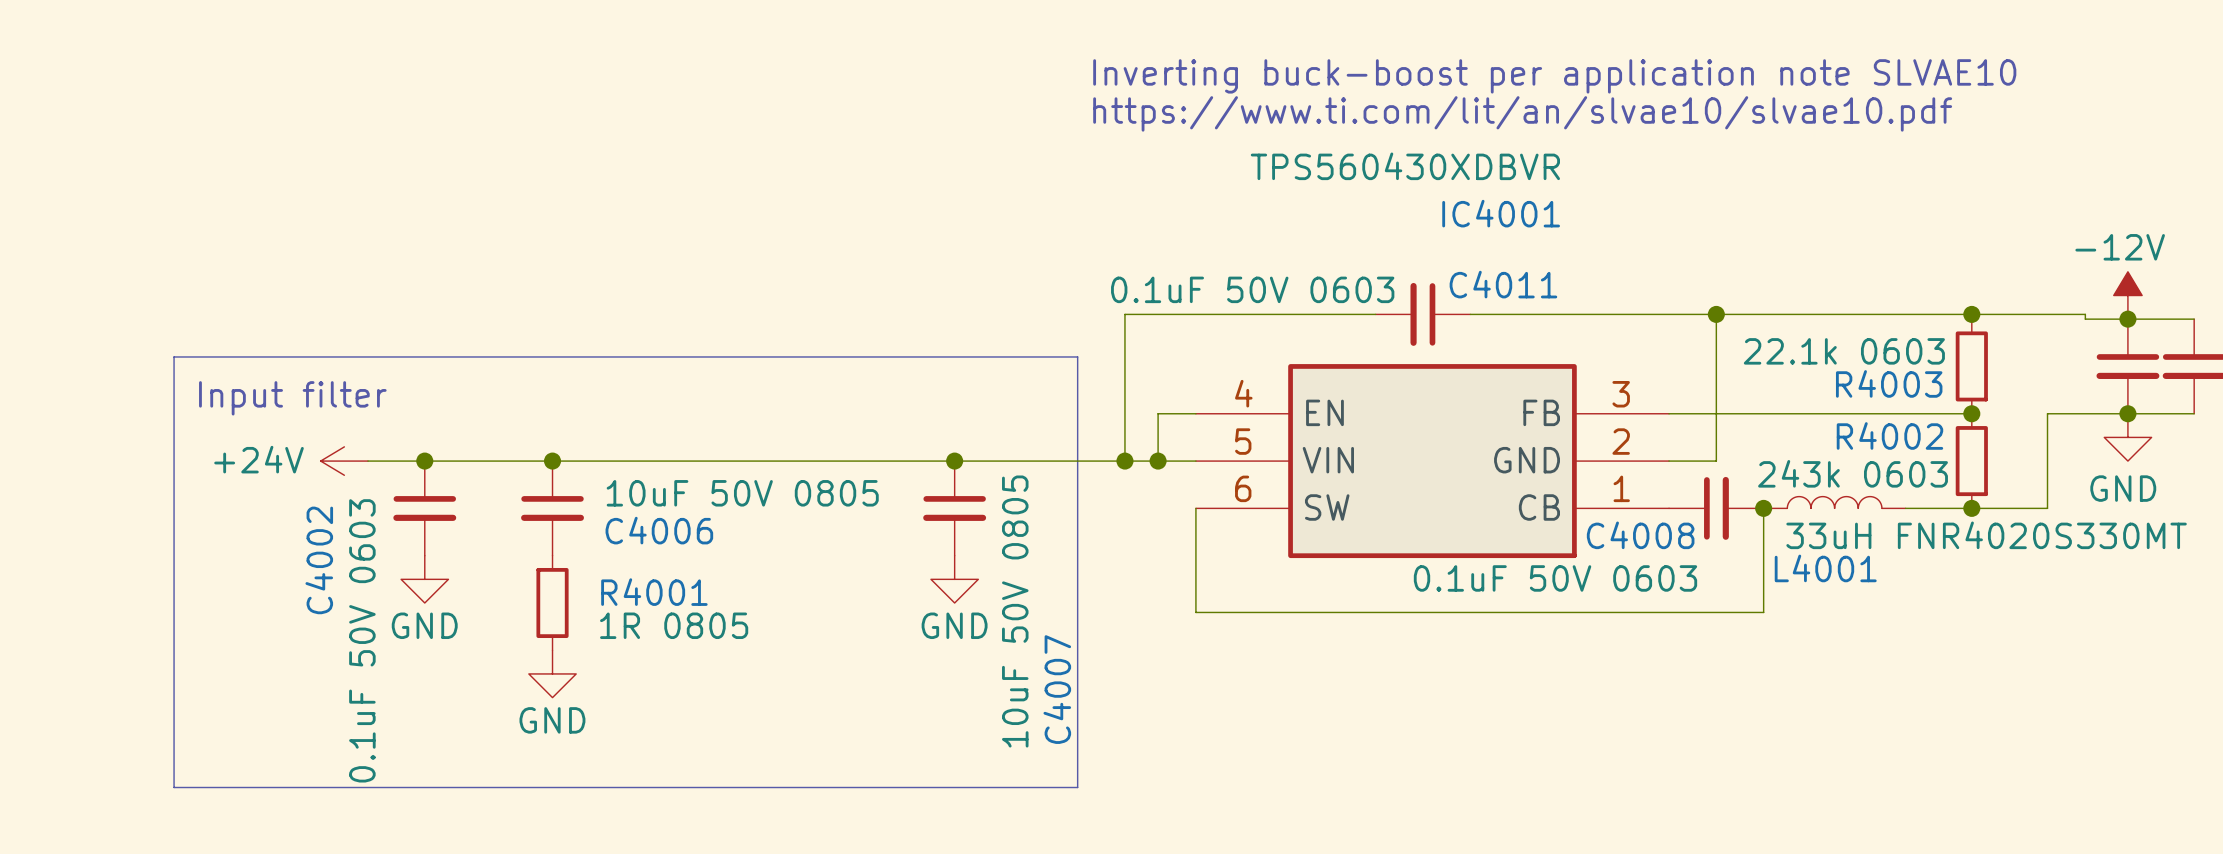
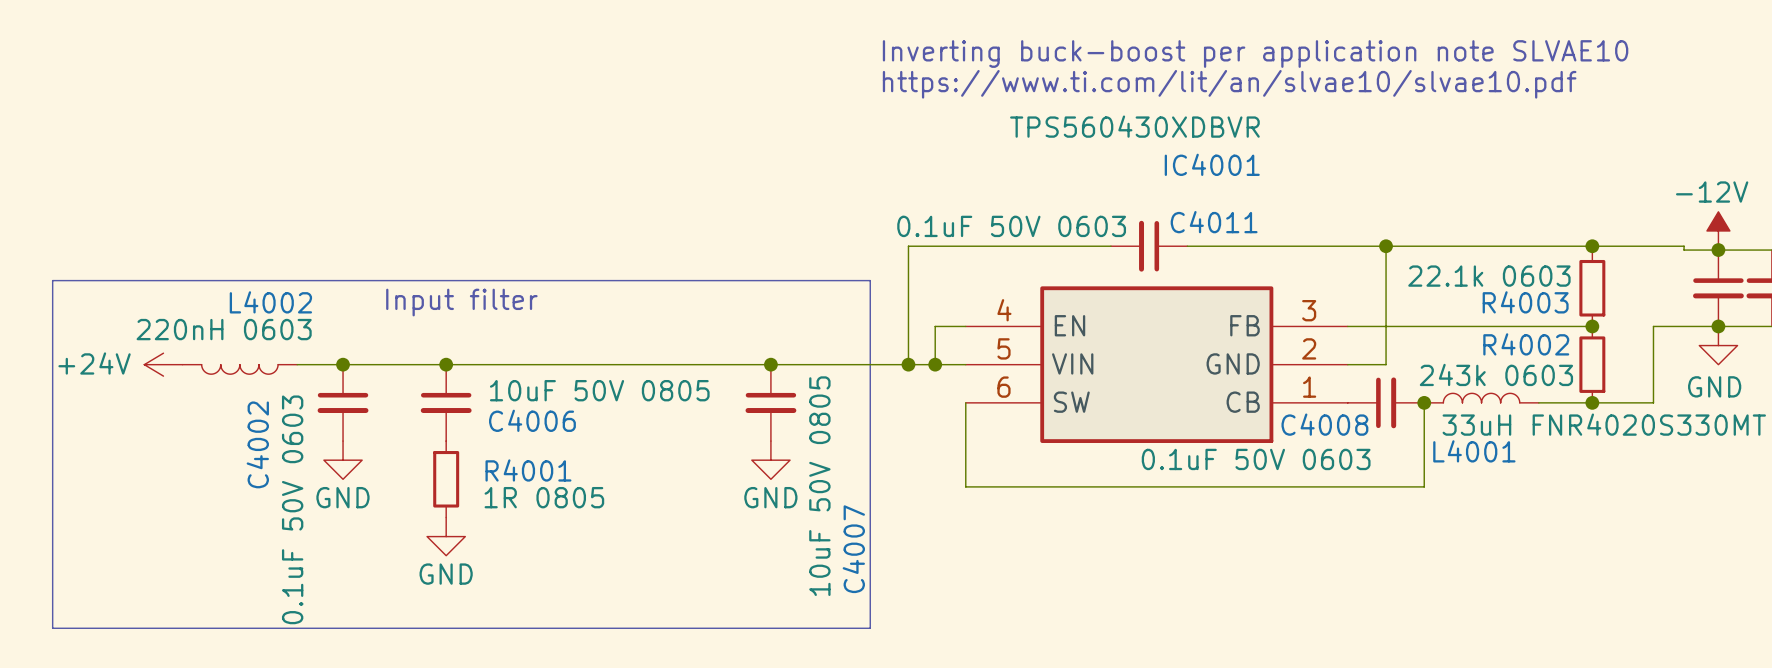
line: (174, 356) (174, 787) -> (140, 280) (52, 280) (52, 628) (140, 628)
text position: Input filter (292, 398) -> Input filter (461, 302)
power symbol position: +24V (344, 461) -> +24V (163, 364)
L4002: none -> 220nH 0603 (239, 369)

